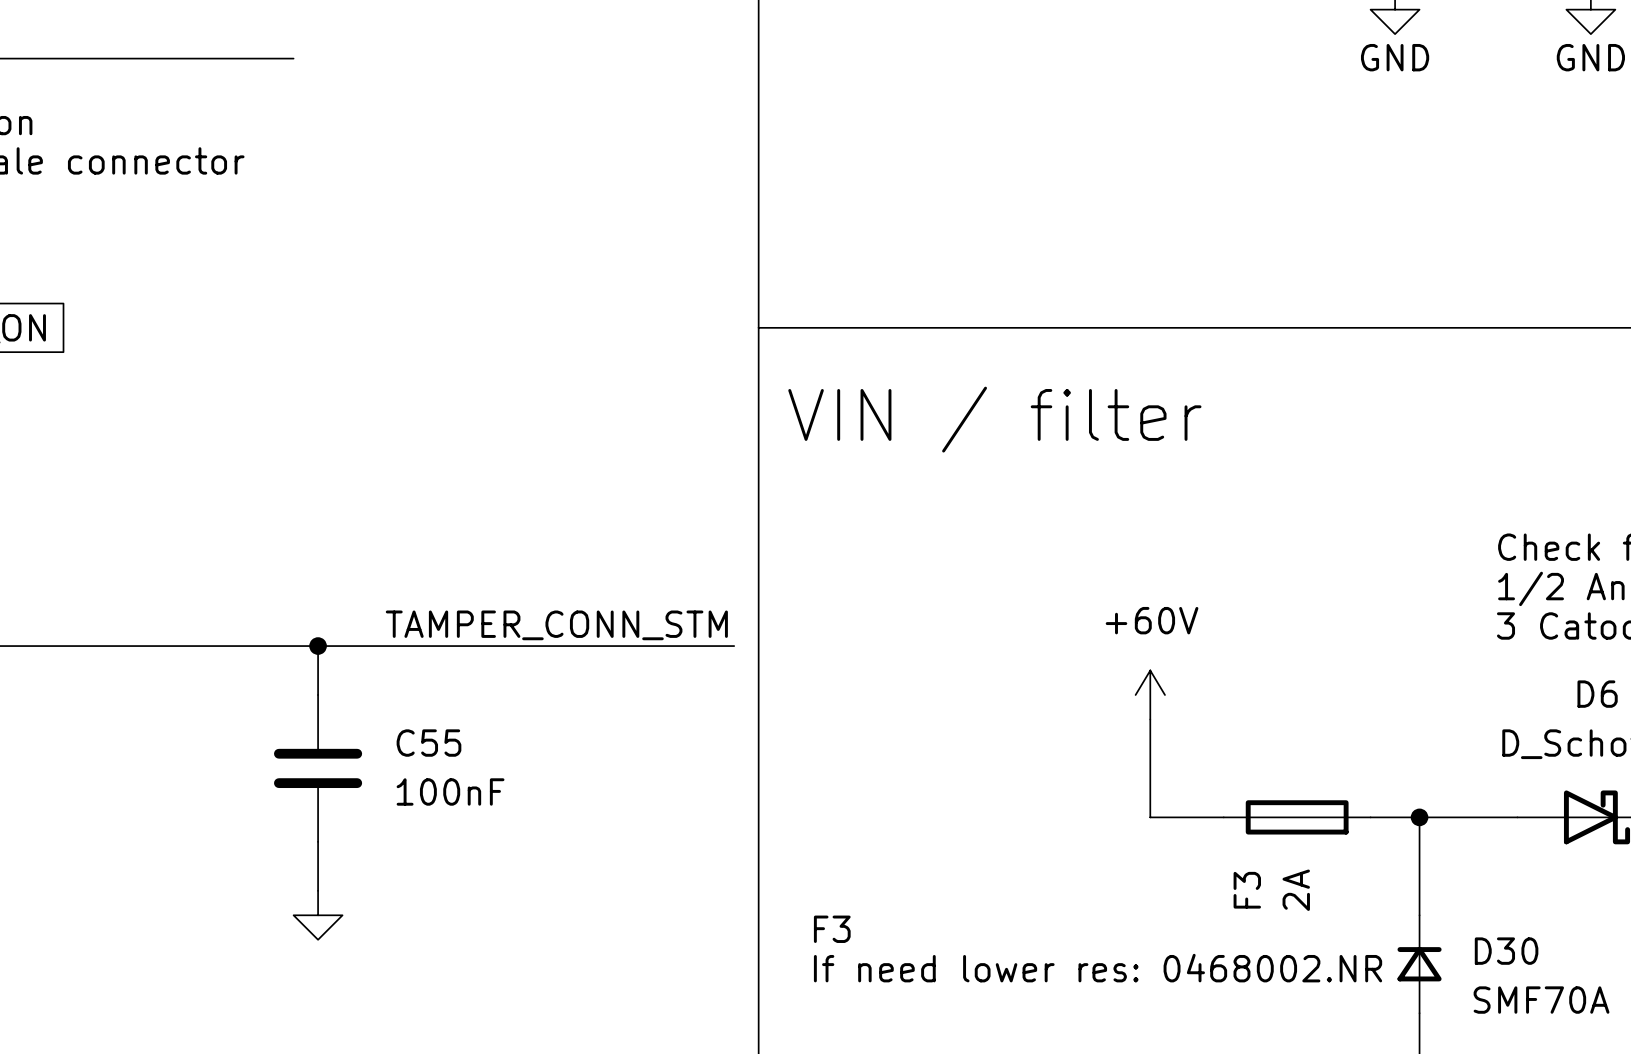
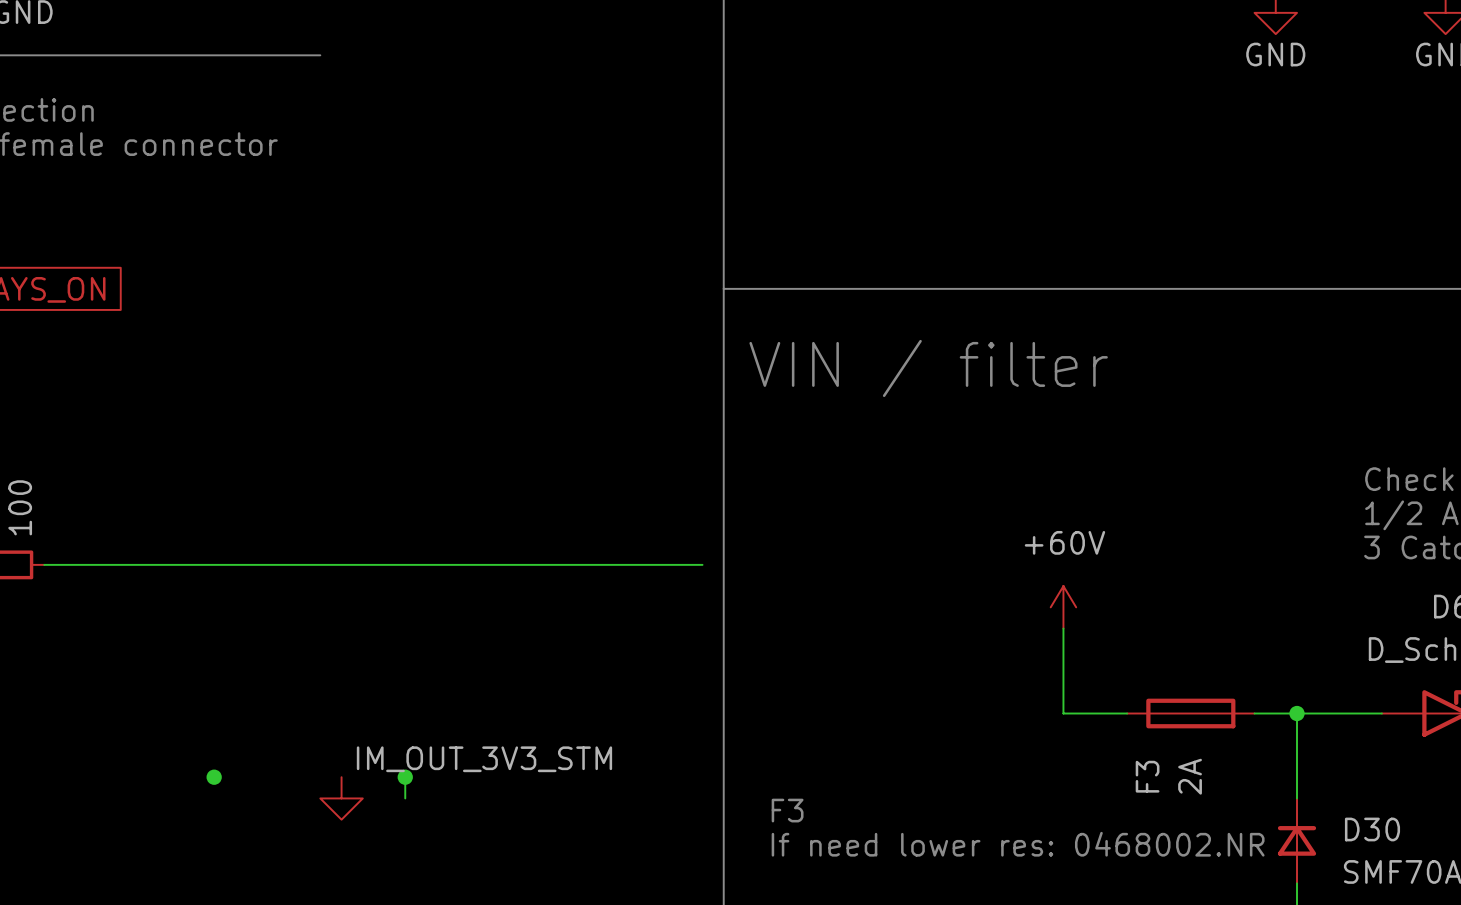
label: TAMPER_CONN_STM (556, 625) -> none
wire: (318, 646) (318, 695) -> none
junction: (318, 646) -> none
C55: 100nF (318, 768) -> none
wire: (318, 841) (318, 890) -> none
label: none -> IM_OUT_3V3_STM (484, 759)
junction: none -> (214, 777)
wire: none -> (405, 777) (405, 798)
junction: none -> (405, 777)

